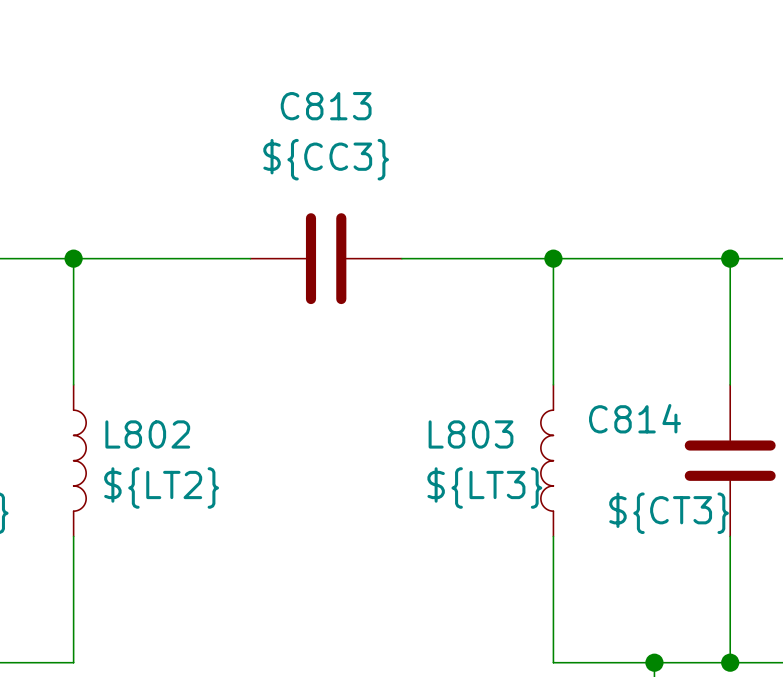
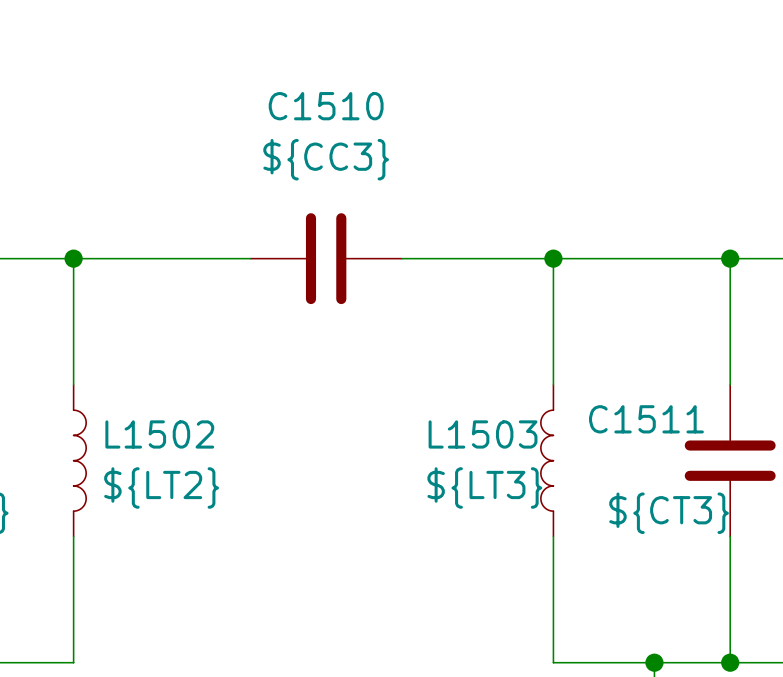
C813 name: C813 (326, 106) -> C1510 (326, 106)
C814 name: C814 (635, 418) -> C1511 (646, 419)
L802 name: L802 (147, 434) -> L1502 (159, 434)
L803 name: L803 (471, 434) -> L1503 (483, 434)

